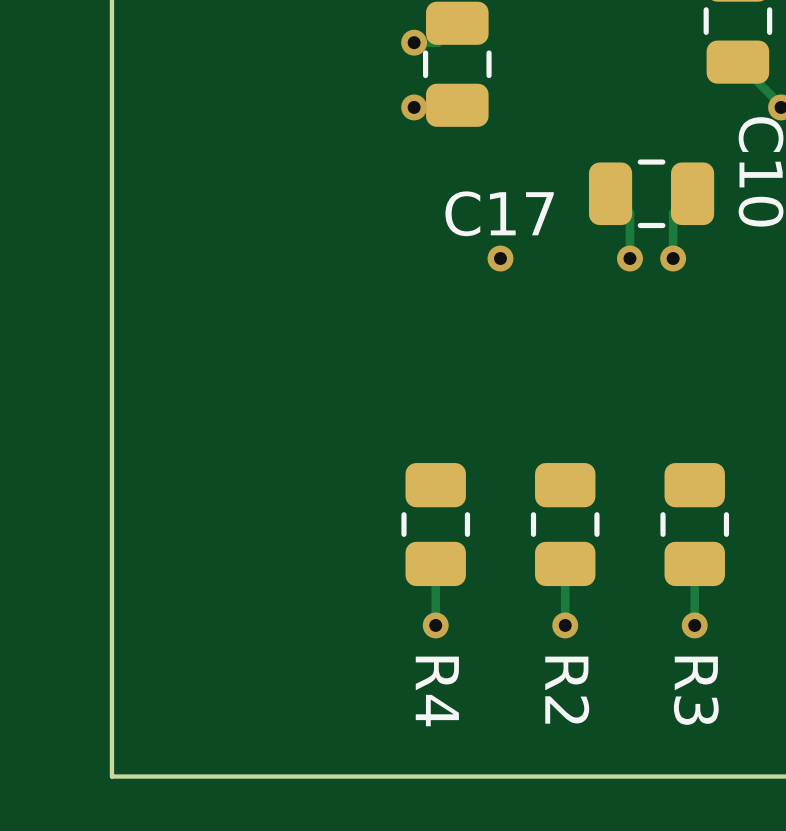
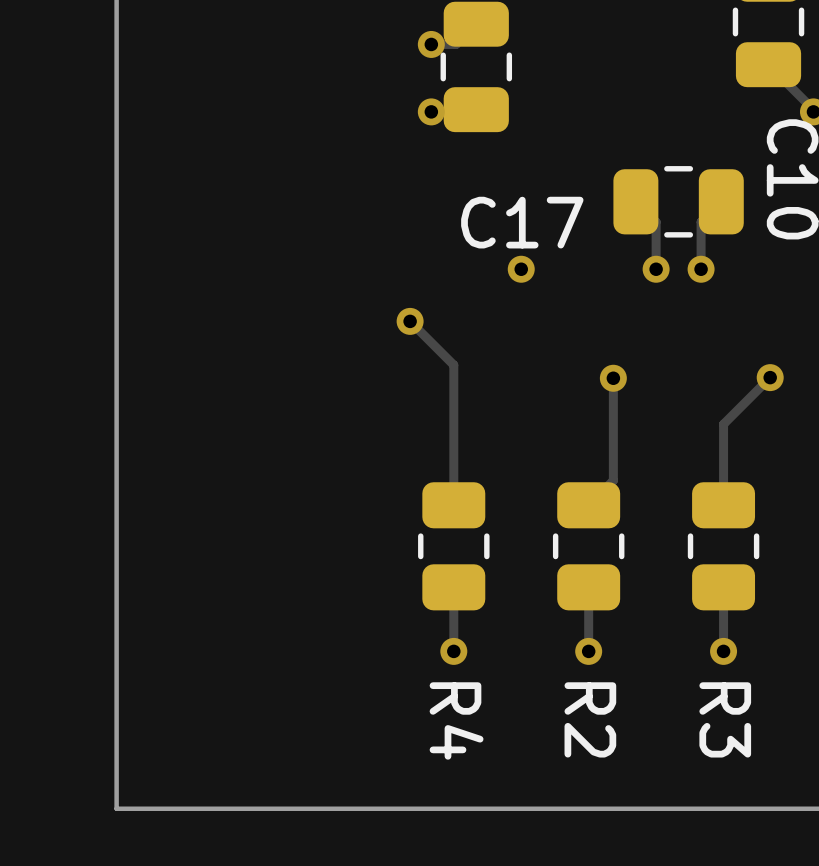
track: none -> (410, 321) (453, 365) (453, 505)
via: none -> (410, 321)
track: none -> (770, 377) (723, 424) (723, 505)
via: none -> (770, 377)
track: none -> (613, 378) (613, 480) (588, 505)
via: none -> (613, 378)

